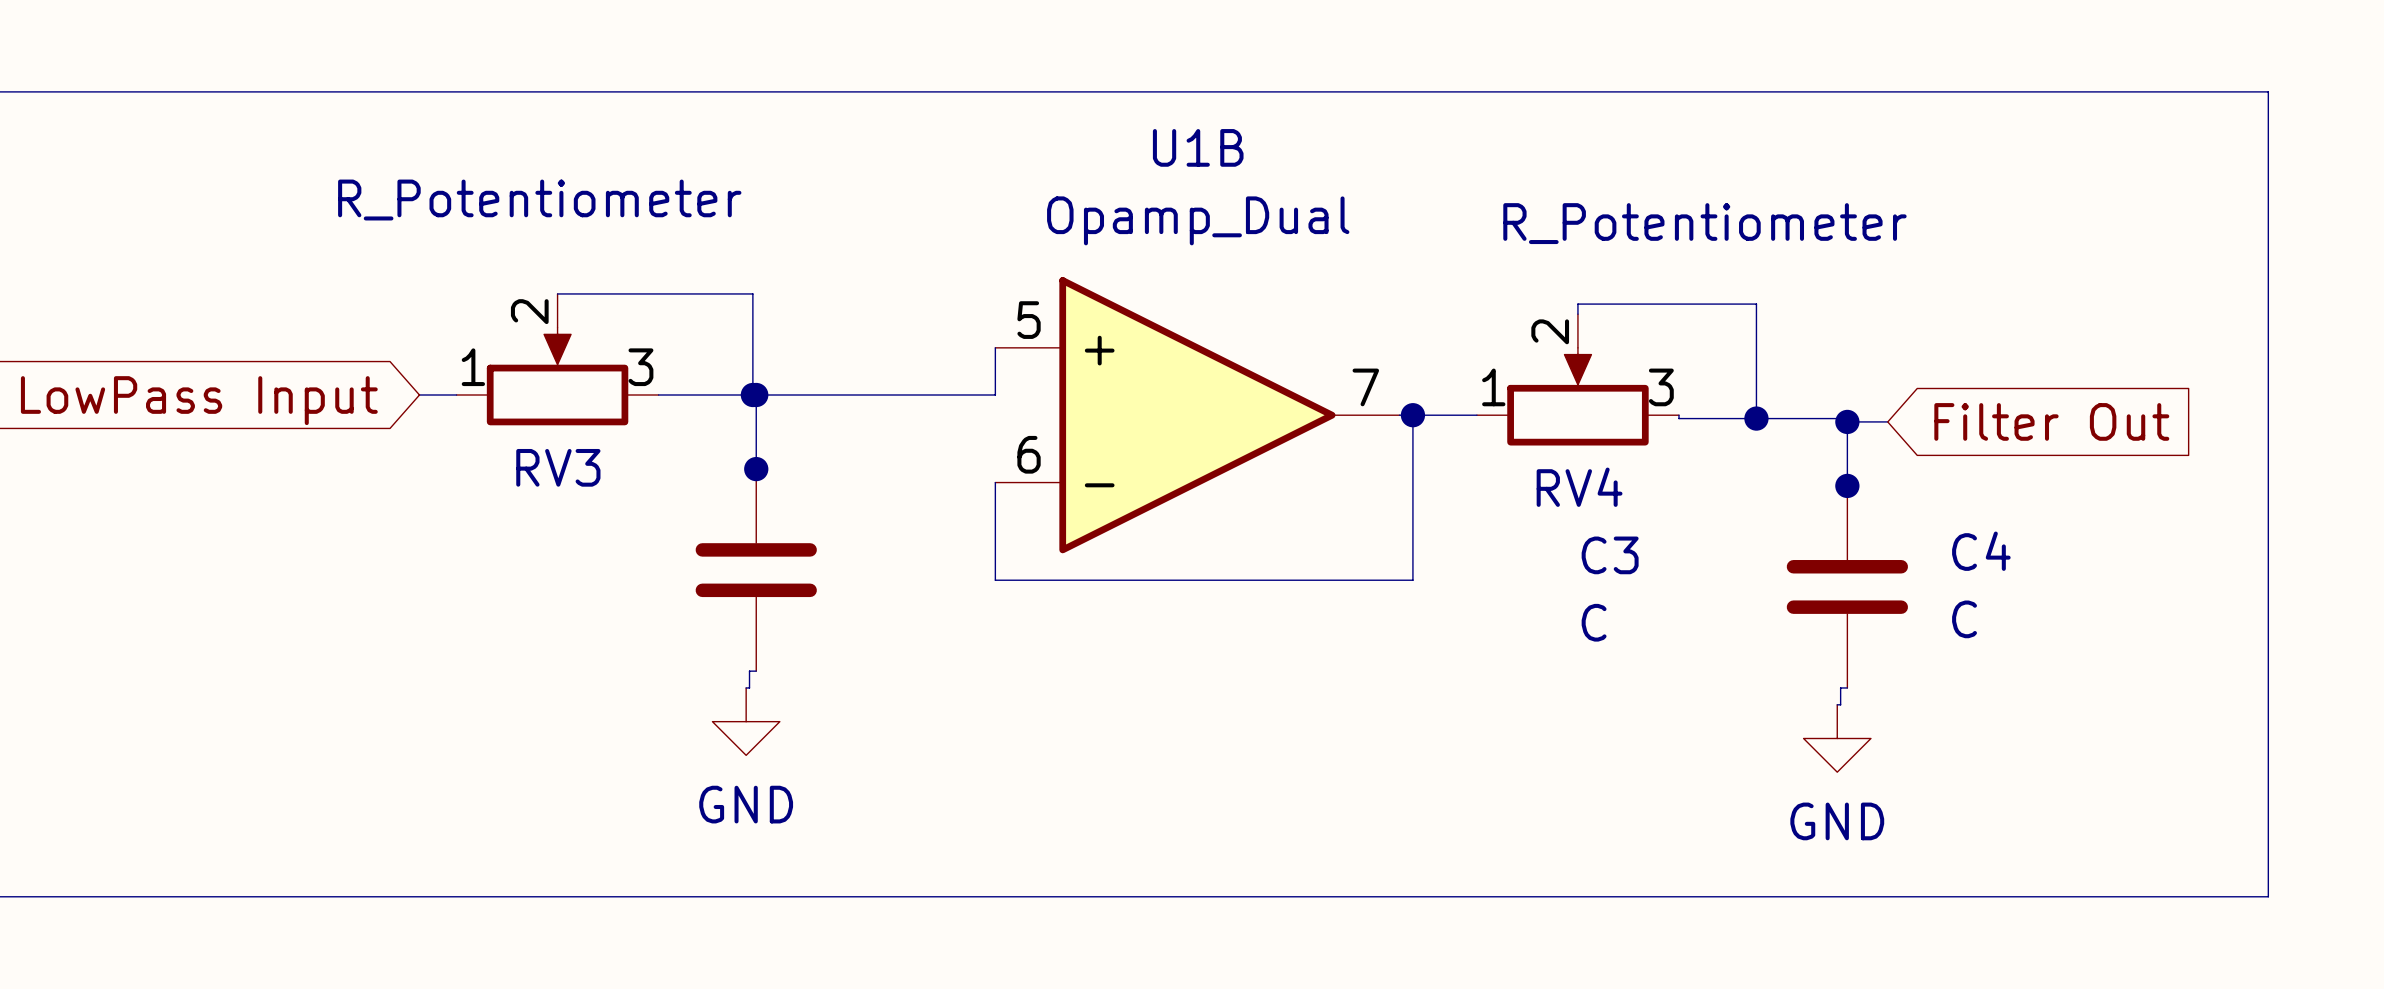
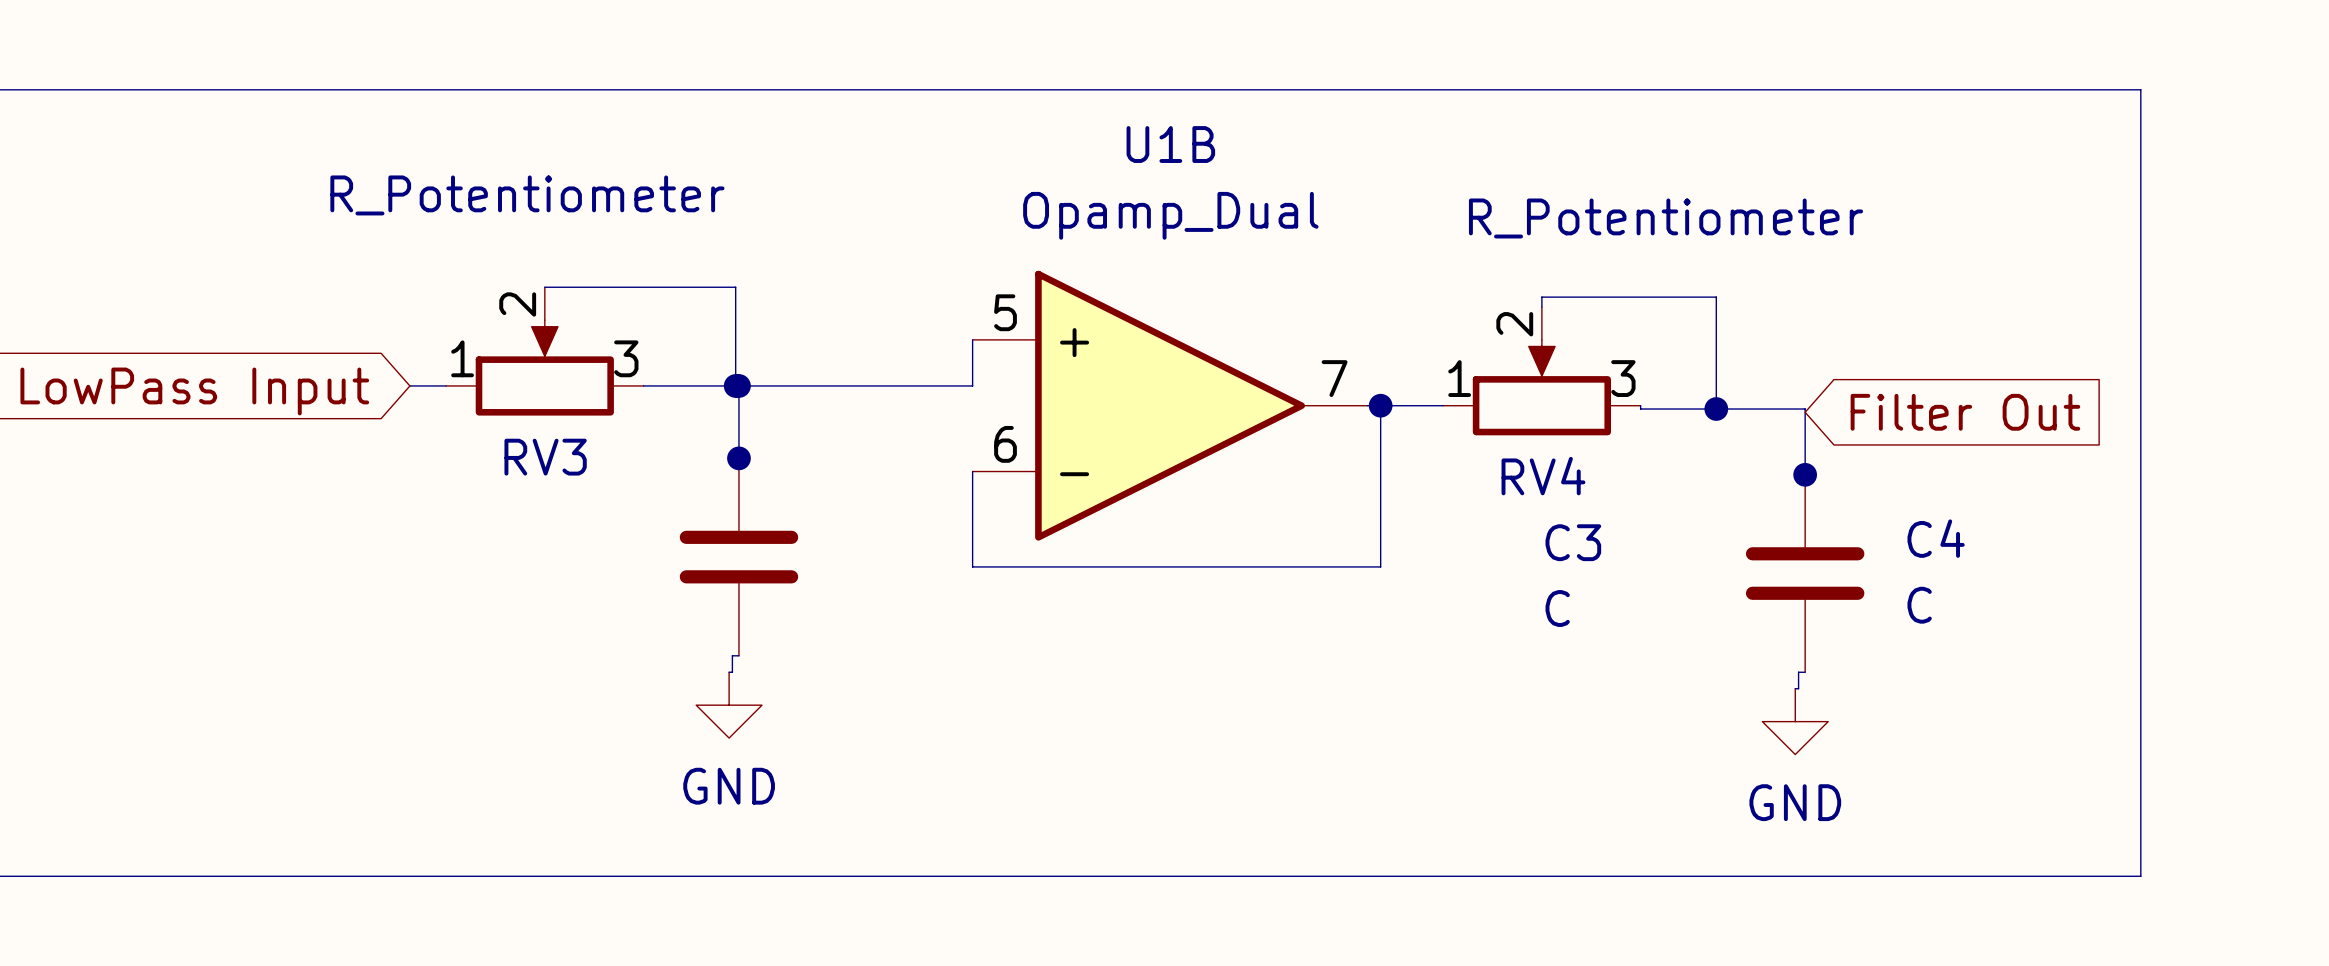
line: (2190, 91) (2268, 91) (2268, 896) (2190, 896) -> (2140, 89) (2140, 876)
wire: (1847, 421) (1887, 421) -> none
junction: (1847, 421) -> none
global label position: Filter Out (2051, 421) -> Filter Out (1965, 412)

